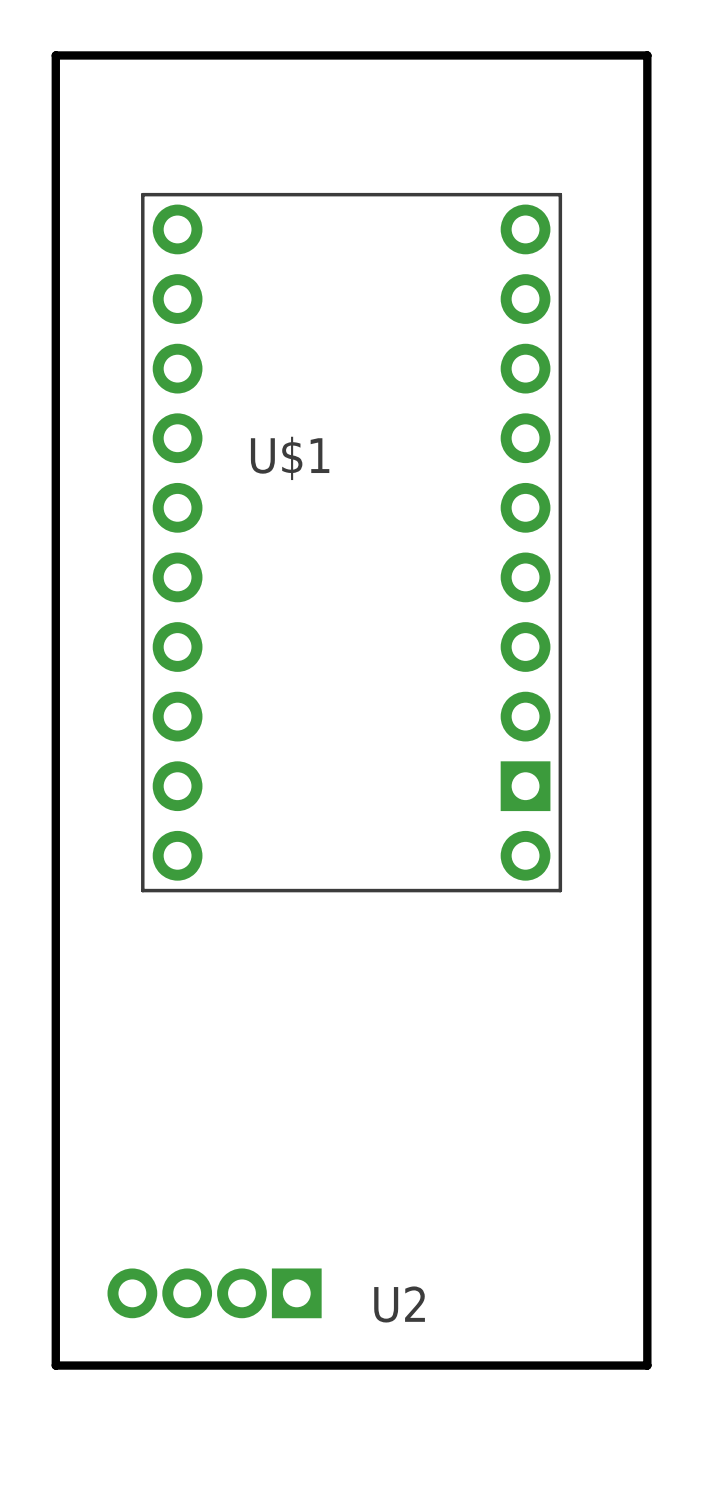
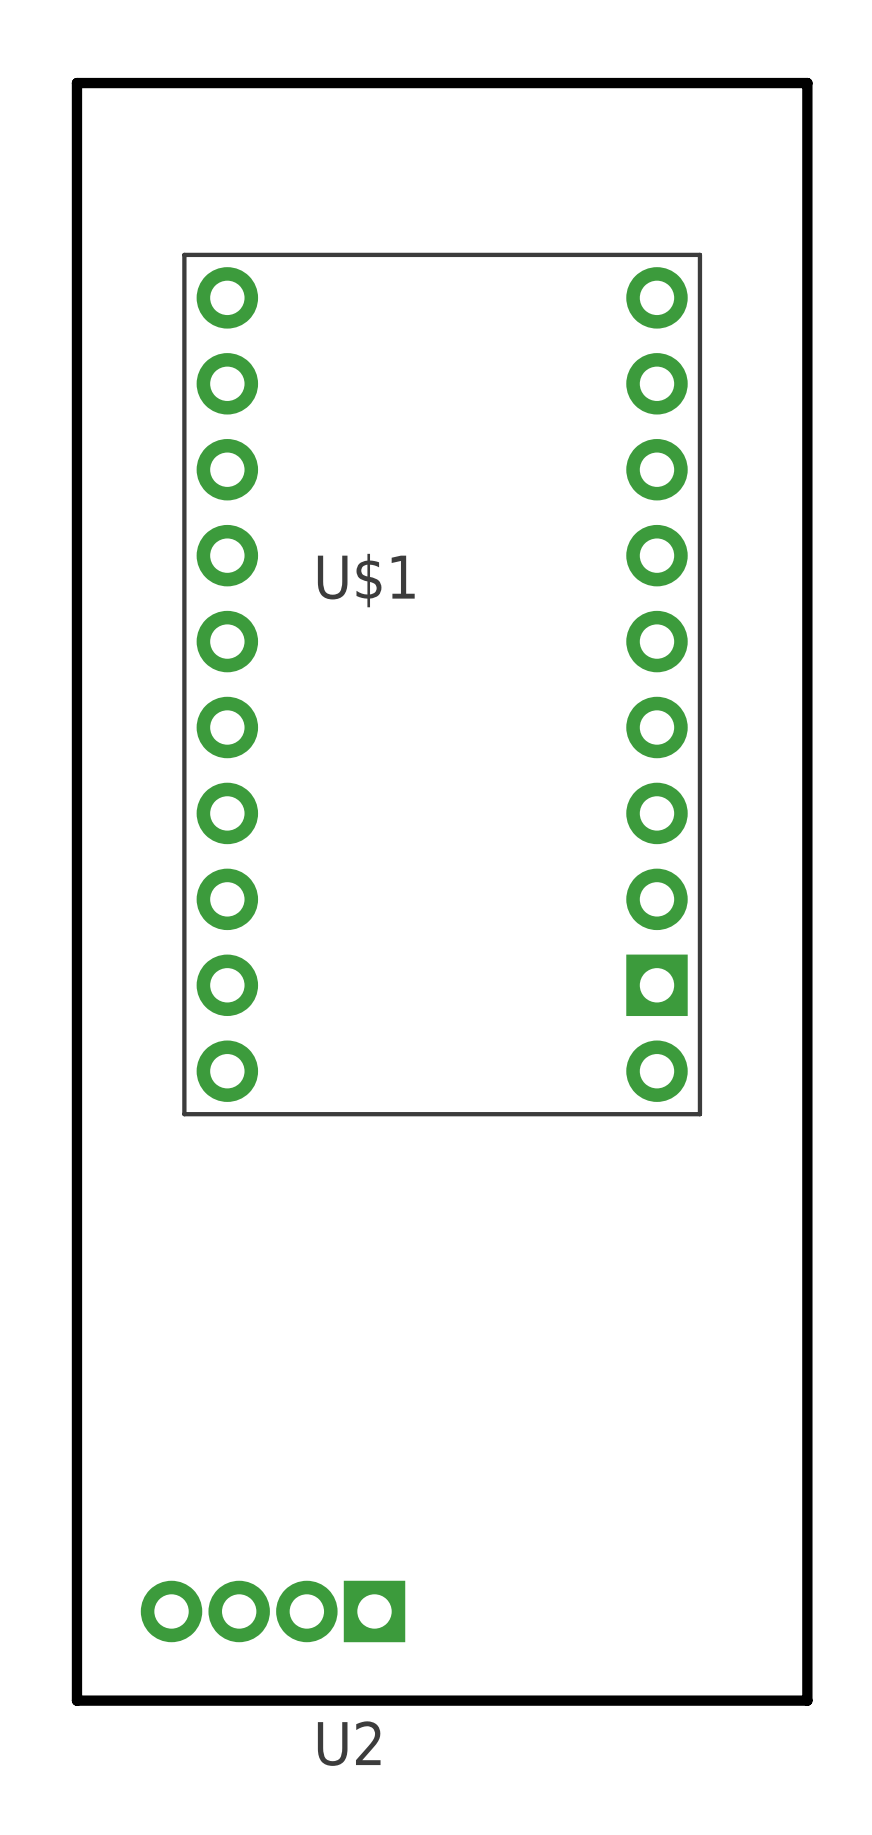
U2 name position: U2 (399, 1304) -> U2 (349, 1743)

